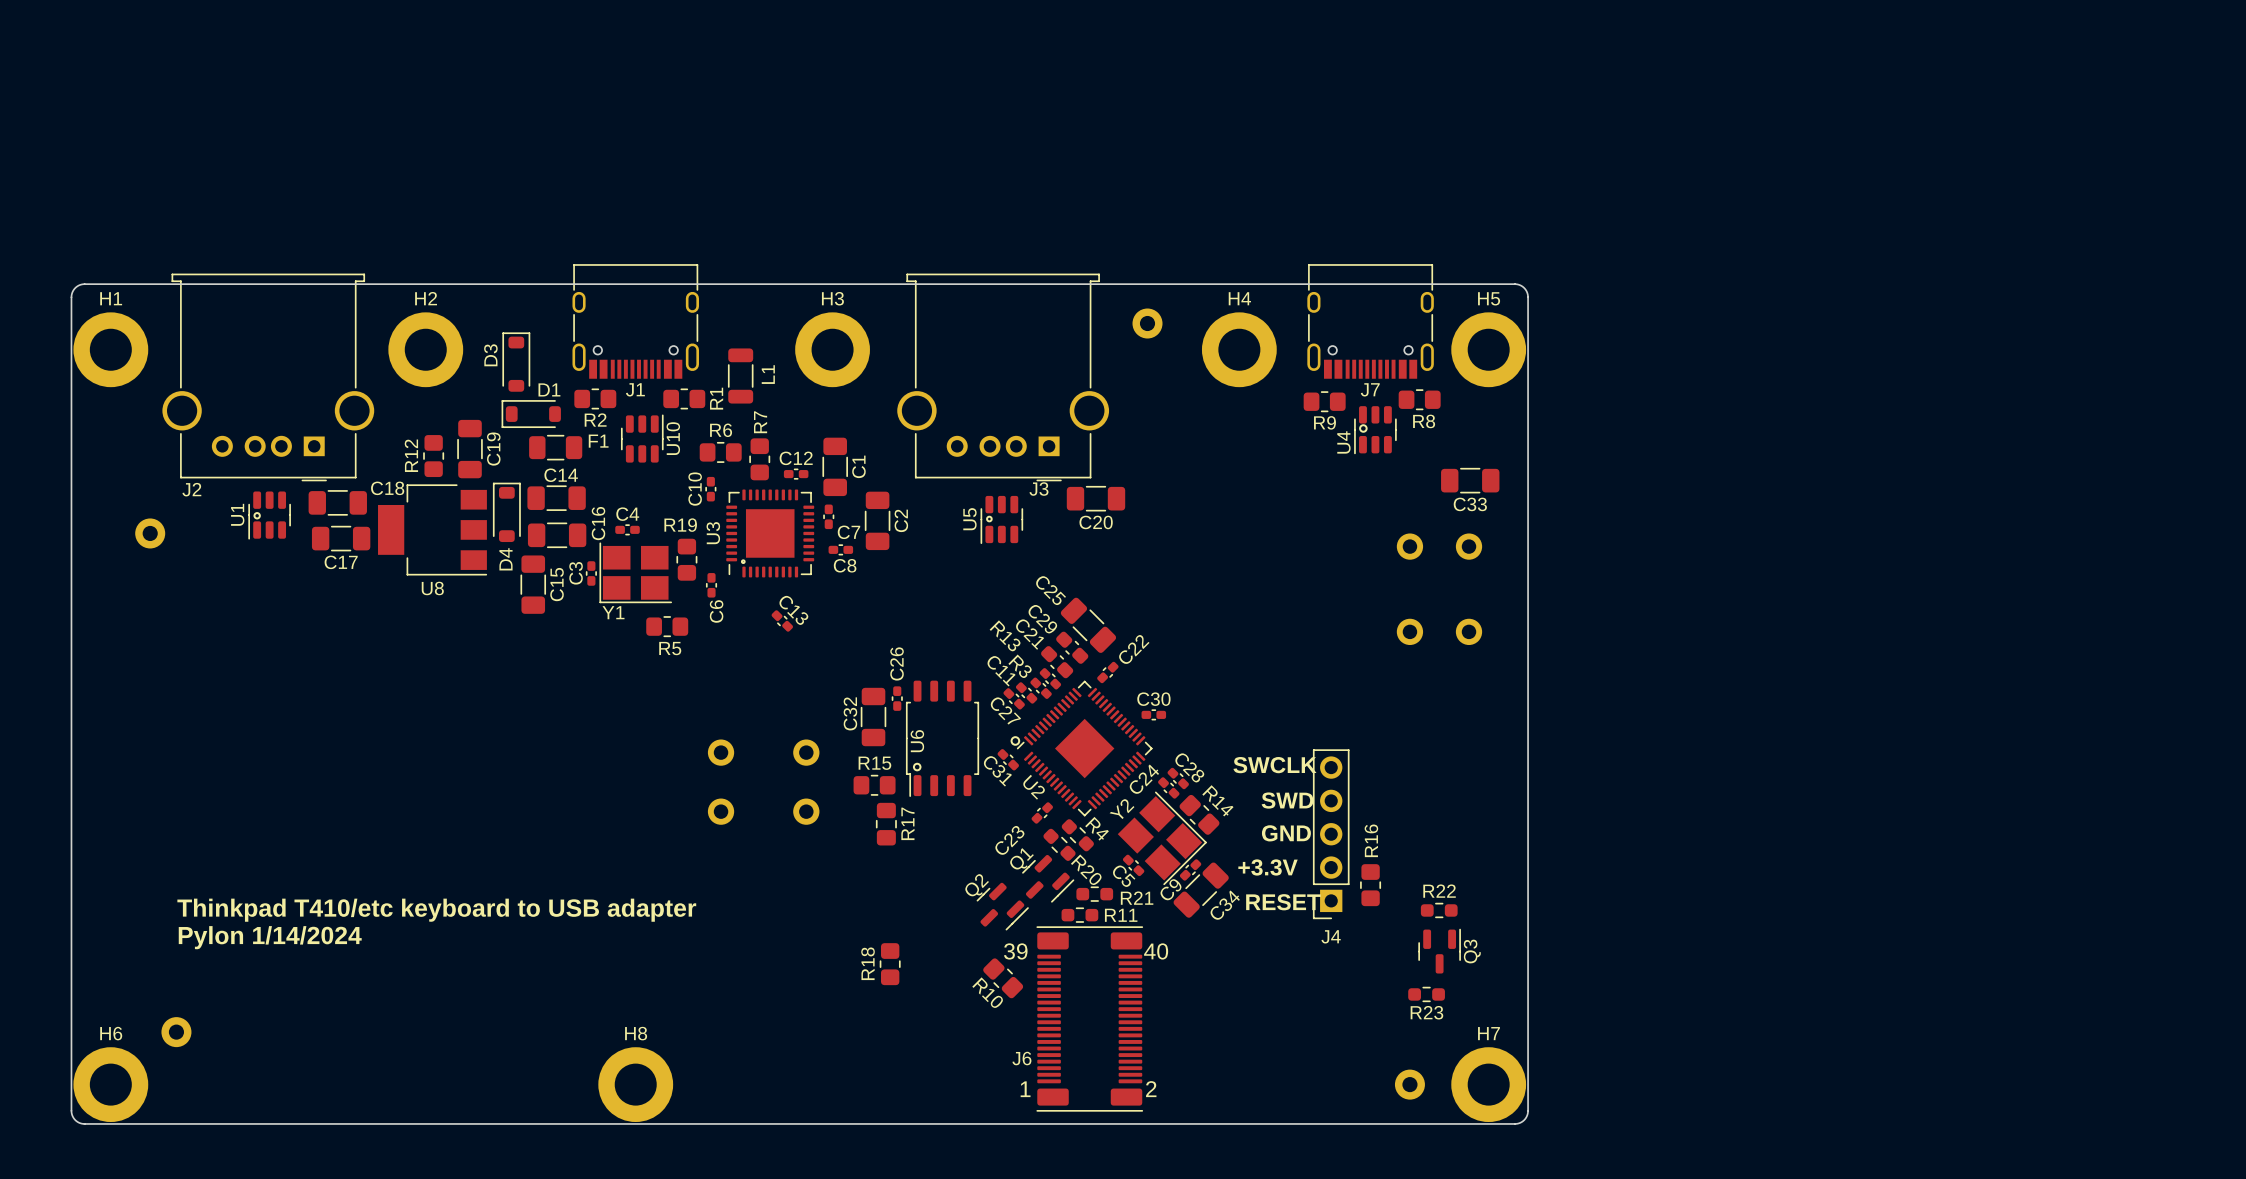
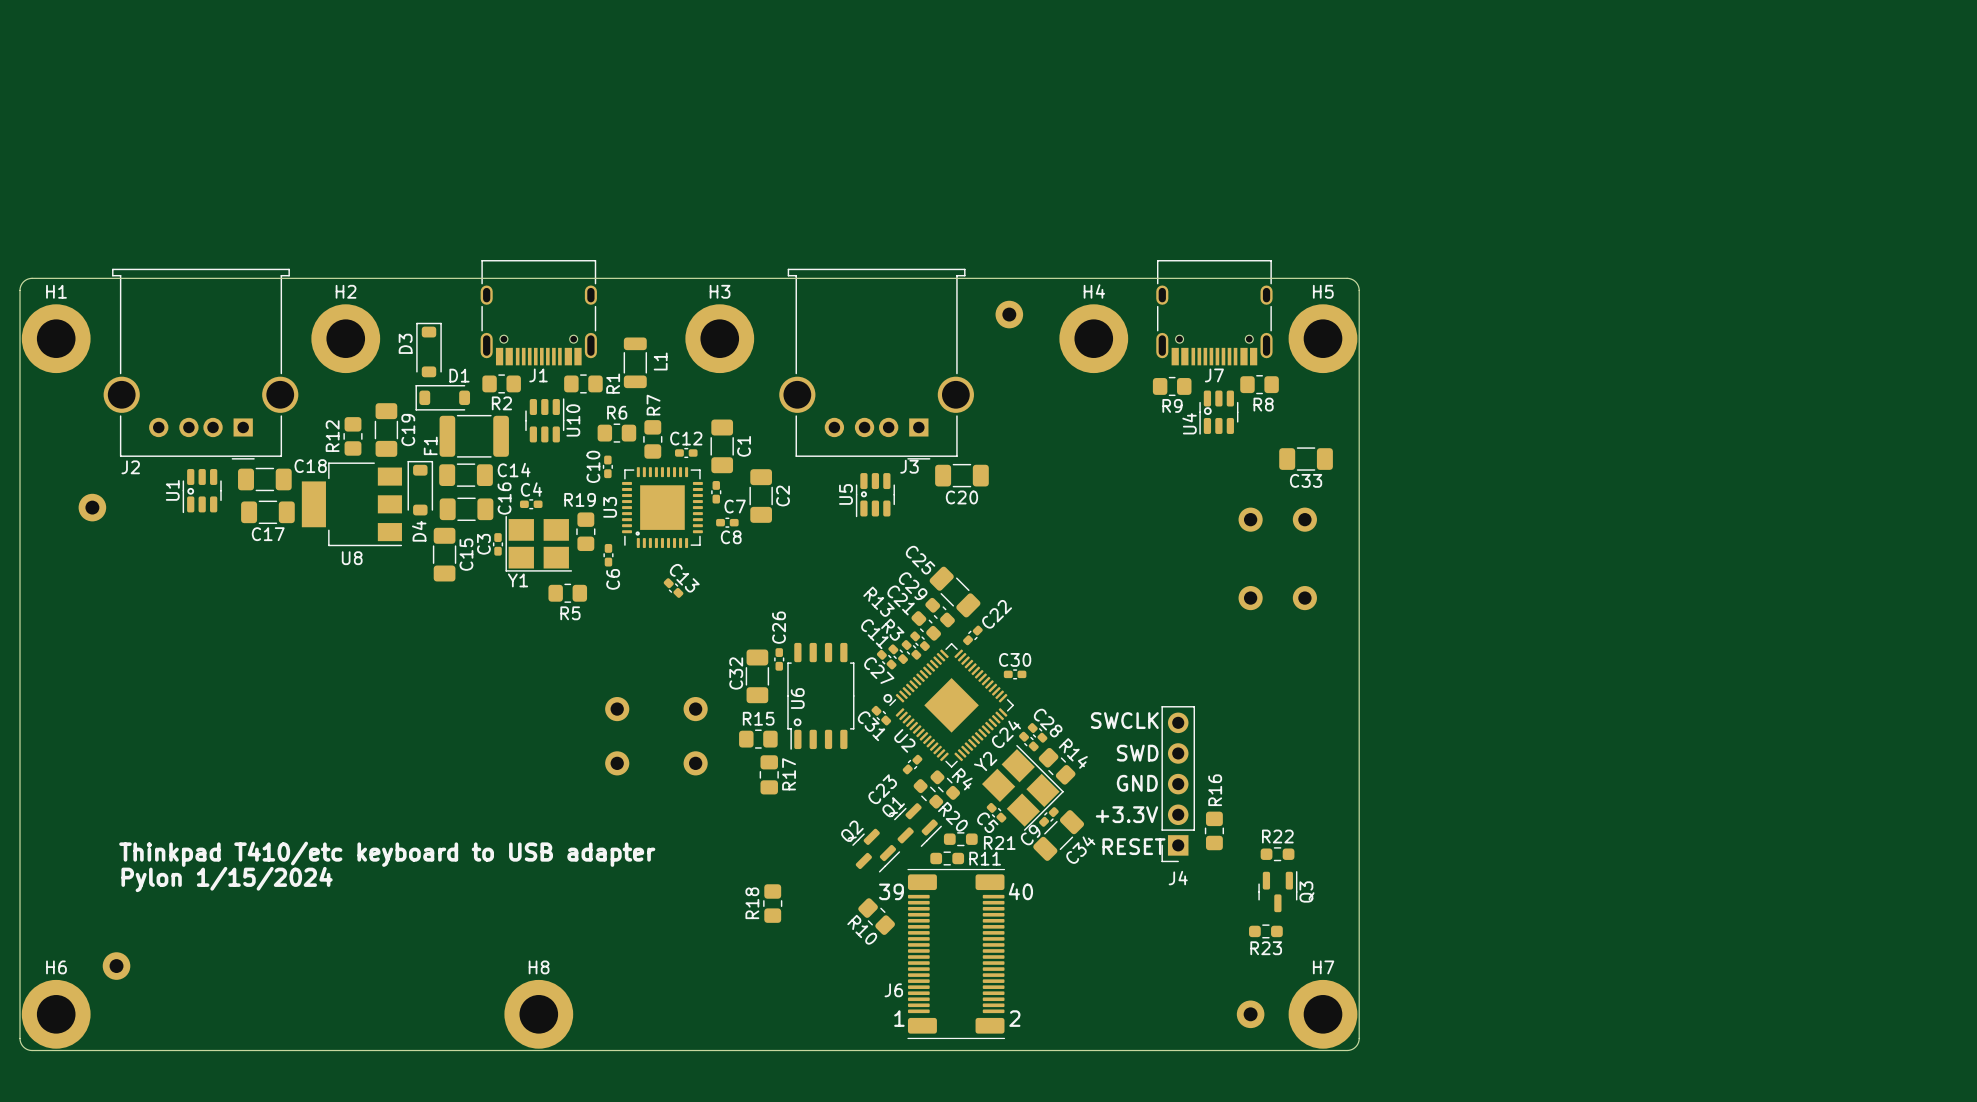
F1 footprint: [529, 434, 583, 461] -> [439, 414, 509, 458]
F1 name position: F1 (598, 441) -> F1 (430, 445)
C14 name position: C14 (561, 475) -> C14 (514, 470)
text: Pylon 1/14/2024 (270, 937) -> Pylon 1/15/2024 (227, 879)

